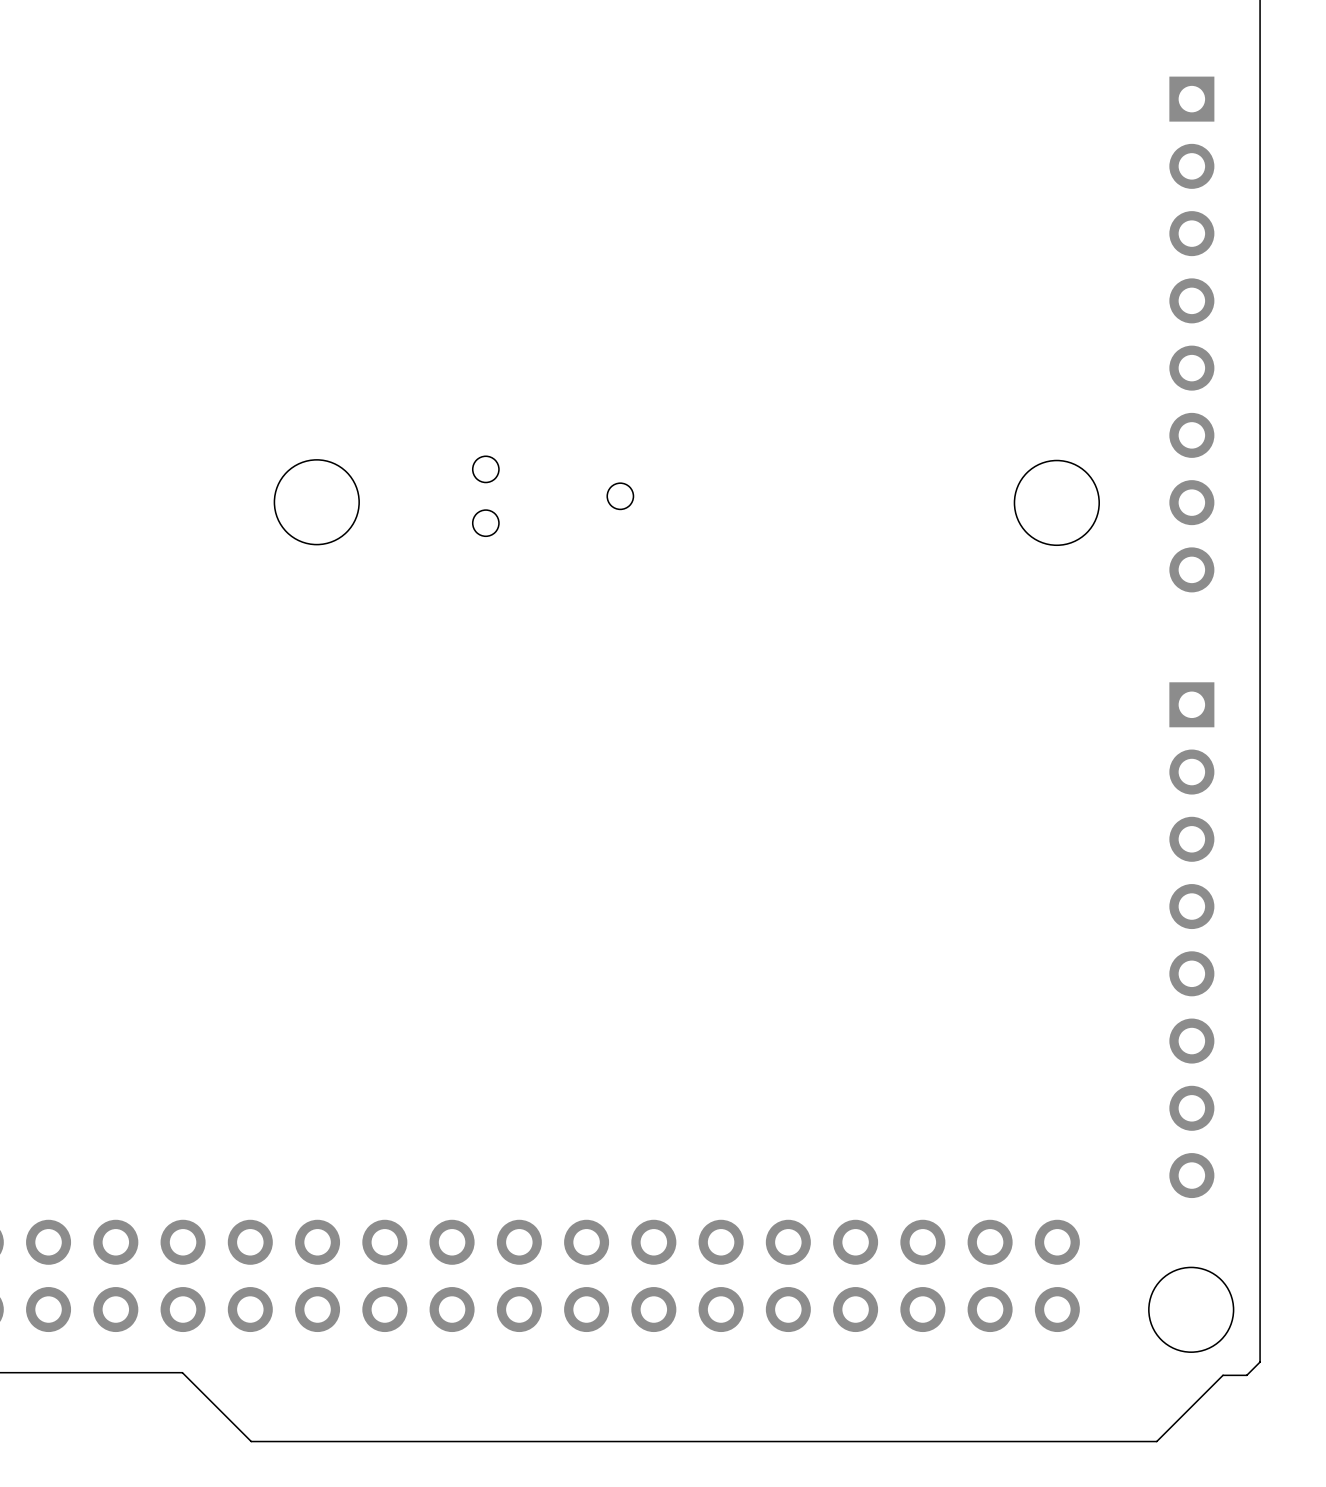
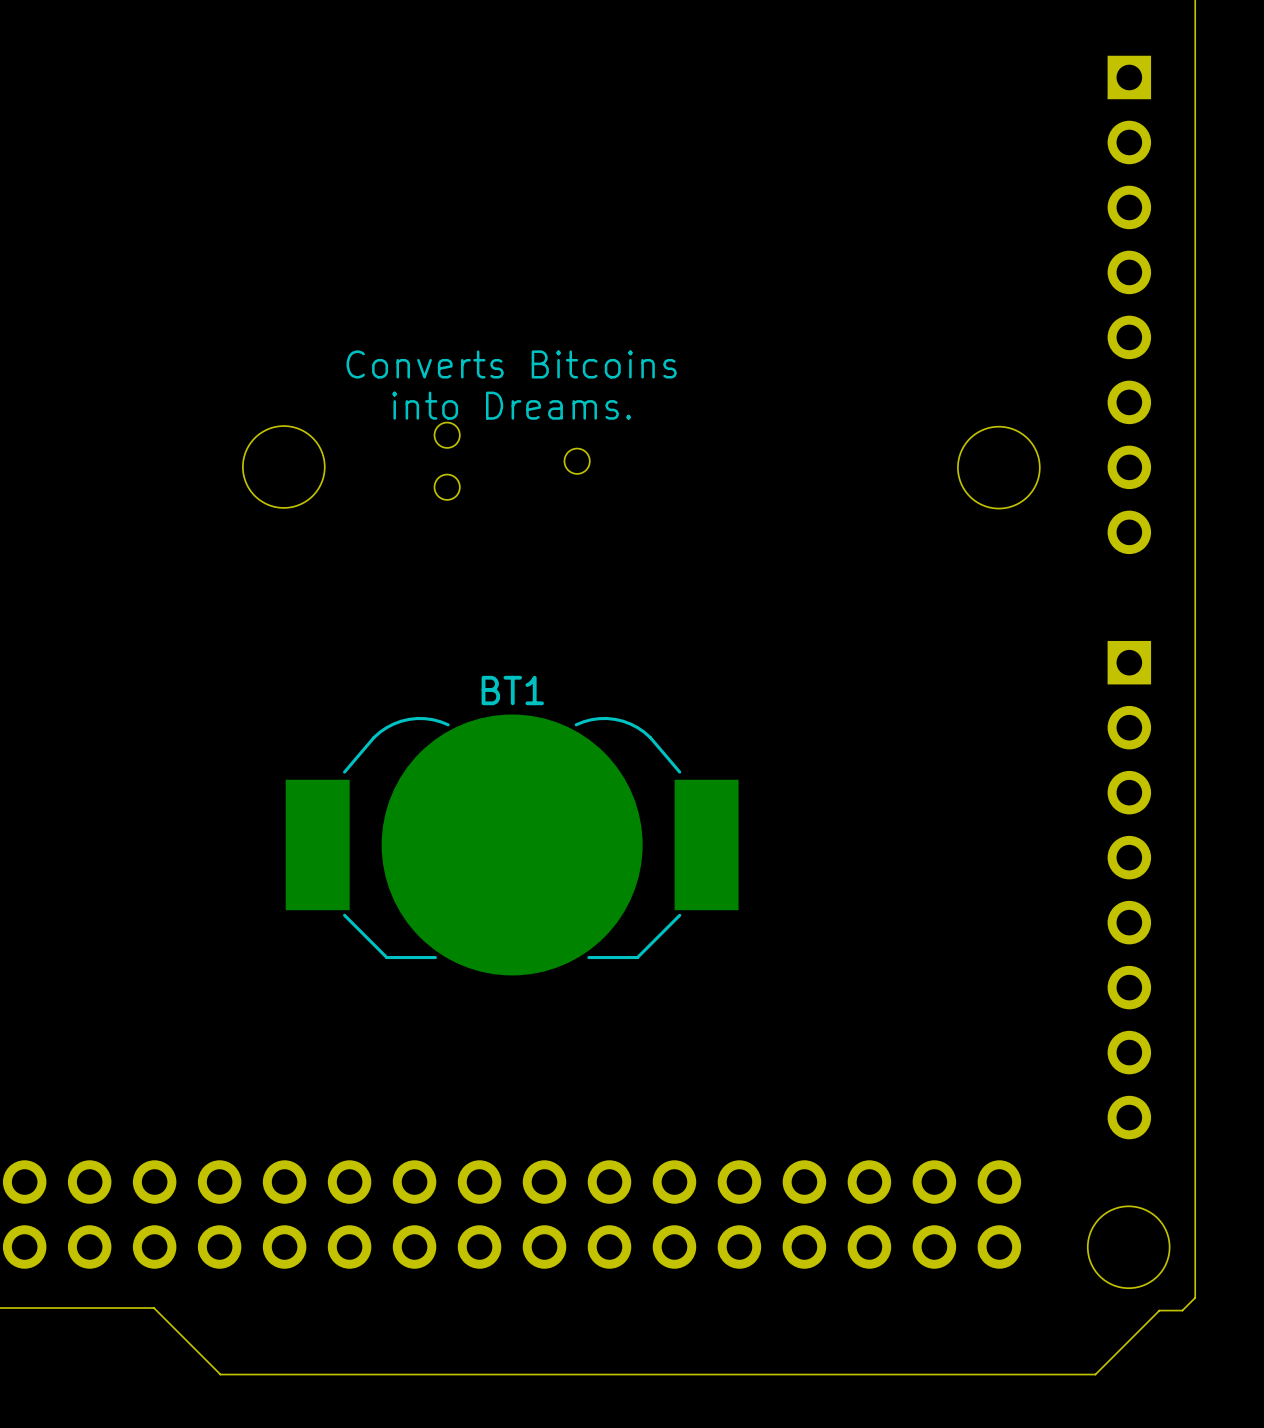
text: none -> Converts Bitcoins (511, 364)
text: none -> into Dreams. (511, 405)
BT1: none -> (512, 844)

